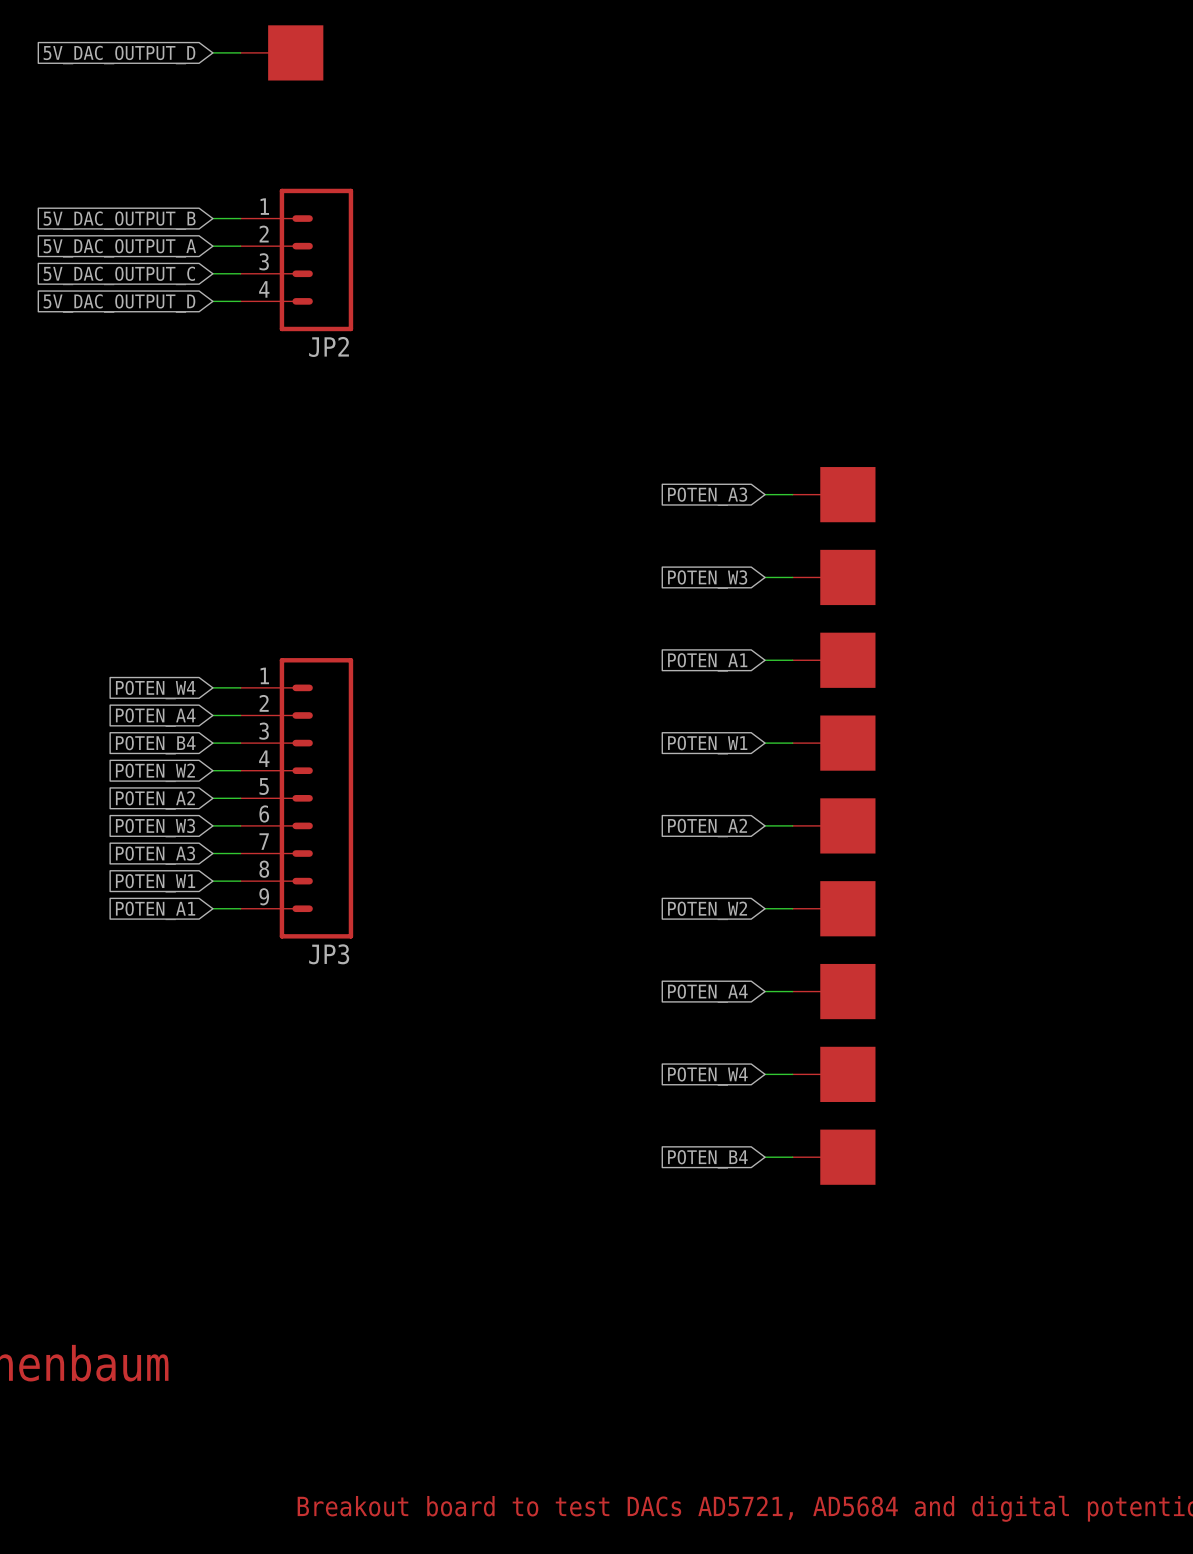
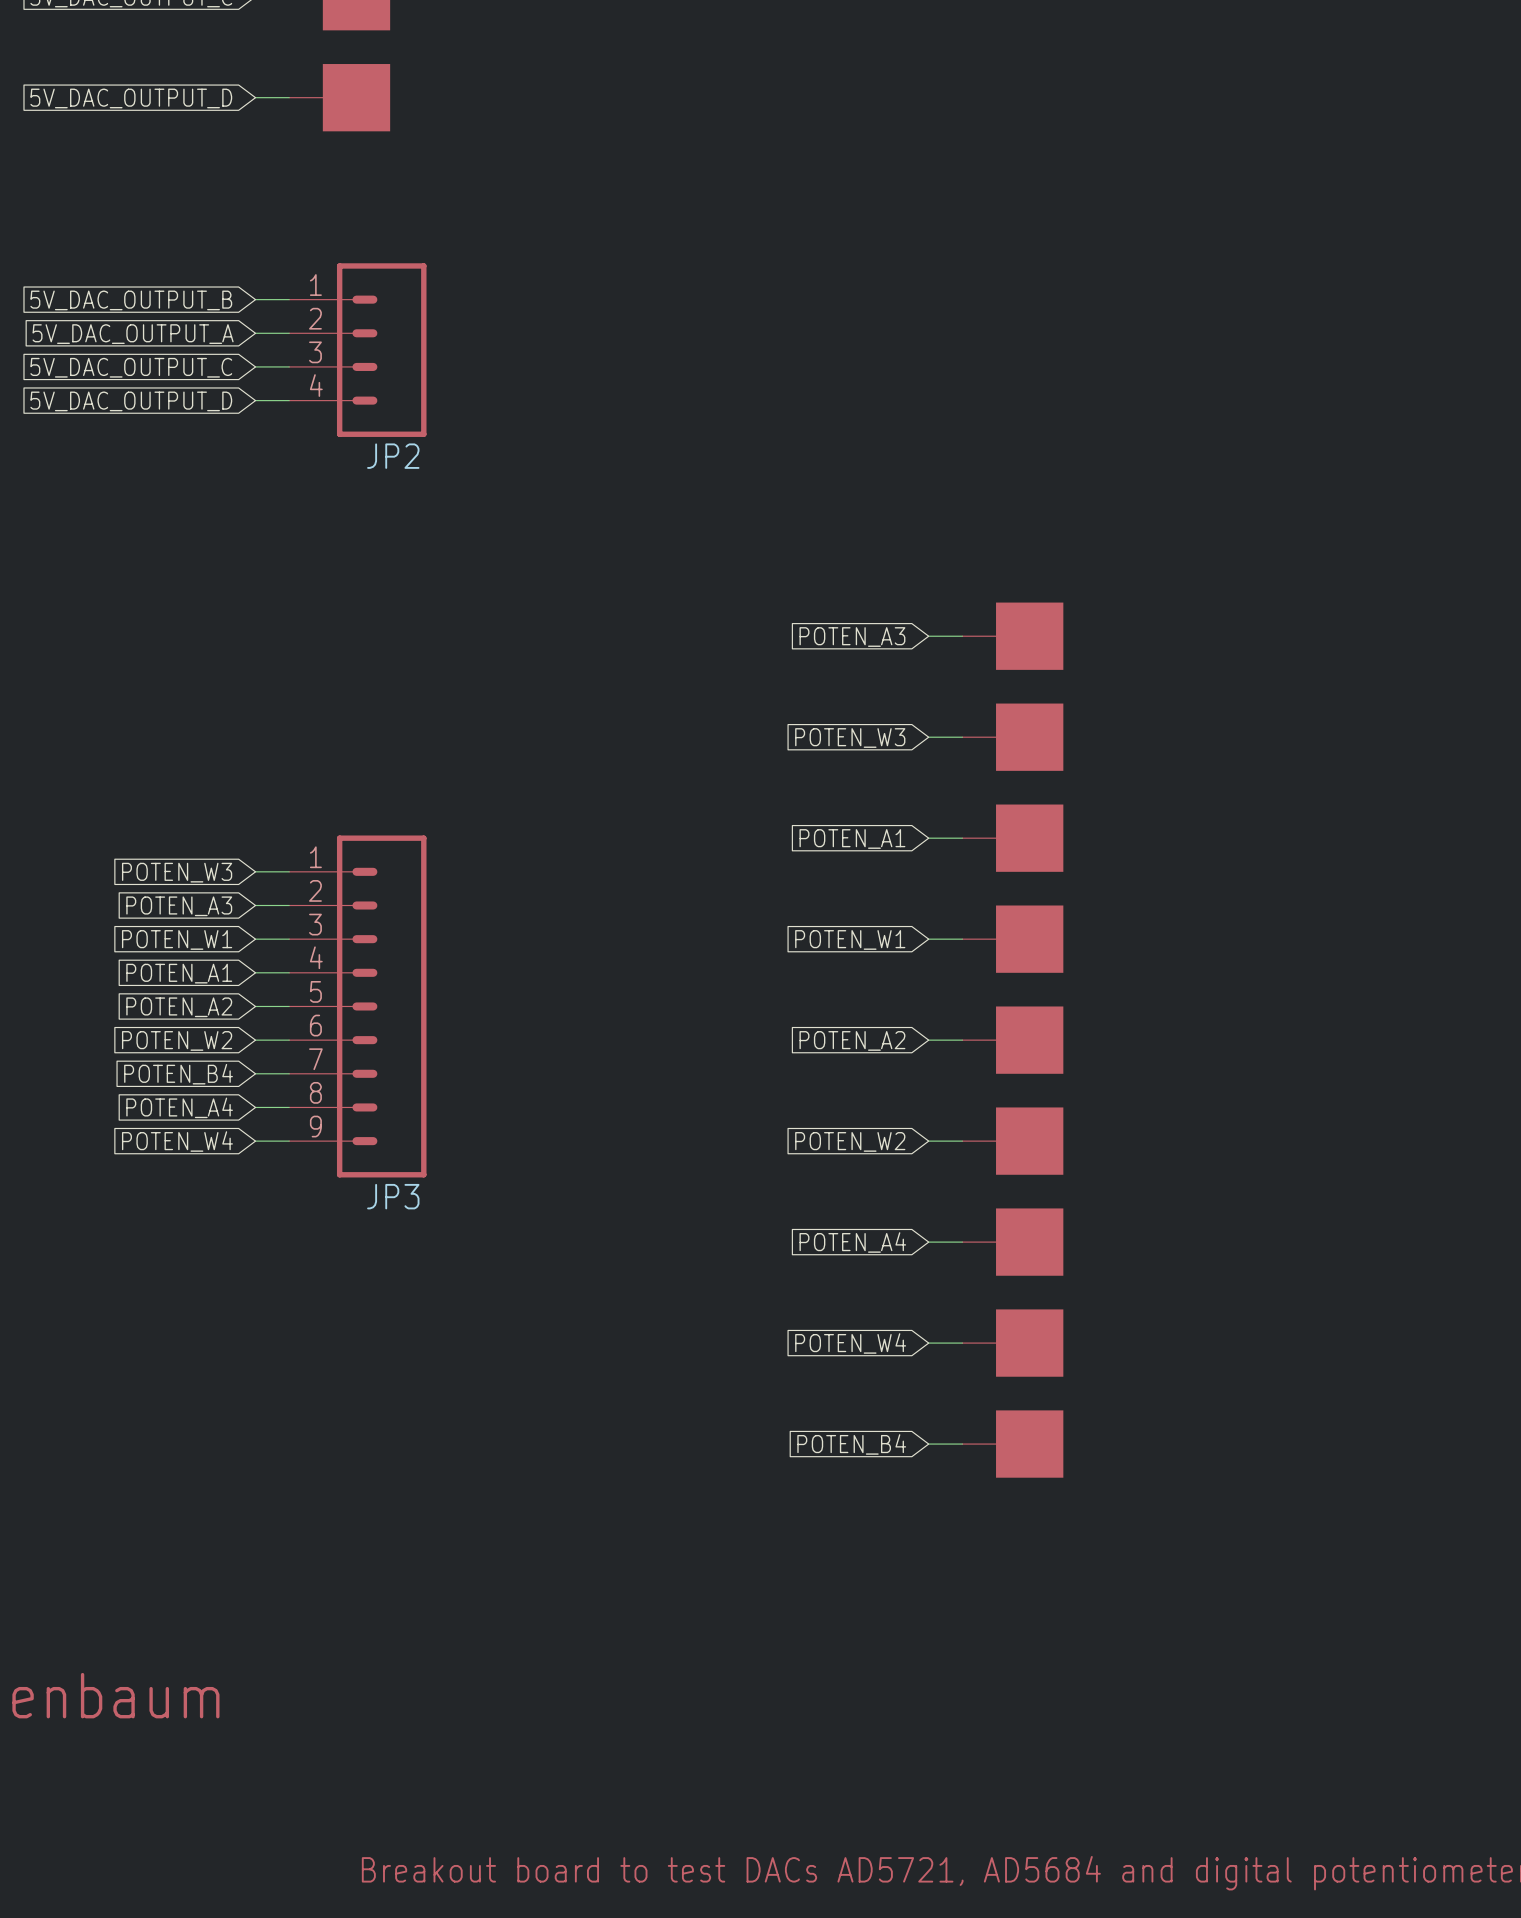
global label: POTEN_W4 (155, 689) -> POTEN_W3 (177, 872)
global label: POTEN_A4 (155, 717) -> POTEN_A3 (179, 906)
global label: POTEN_B4 (155, 745) -> POTEN_W1 (177, 939)
global label: POTEN_W2 (155, 772) -> POTEN_A1 (179, 973)
global label: POTEN_W3 (155, 828) -> POTEN_W2 (177, 1040)
global label: POTEN_A3 (155, 855) -> POTEN_B4 (178, 1074)
global label: POTEN_W1 (155, 883) -> POTEN_A4 (179, 1107)
global label: POTEN_A1 (155, 910) -> POTEN_W4 (177, 1141)

